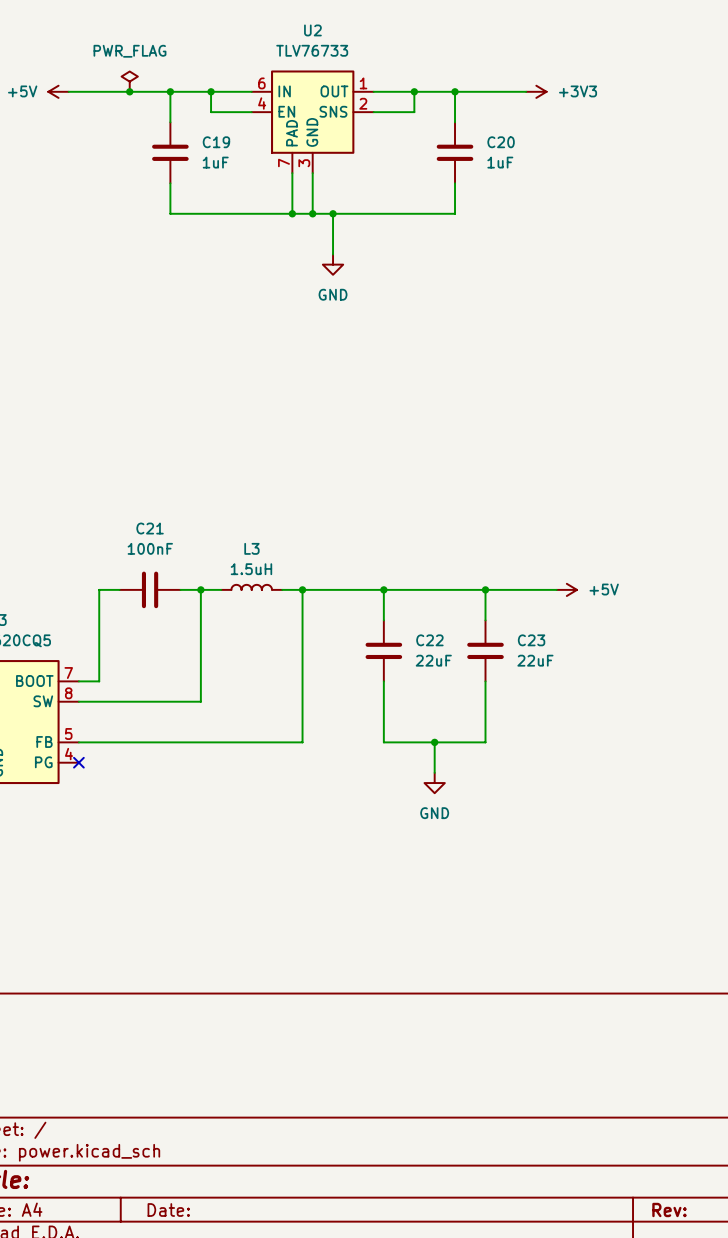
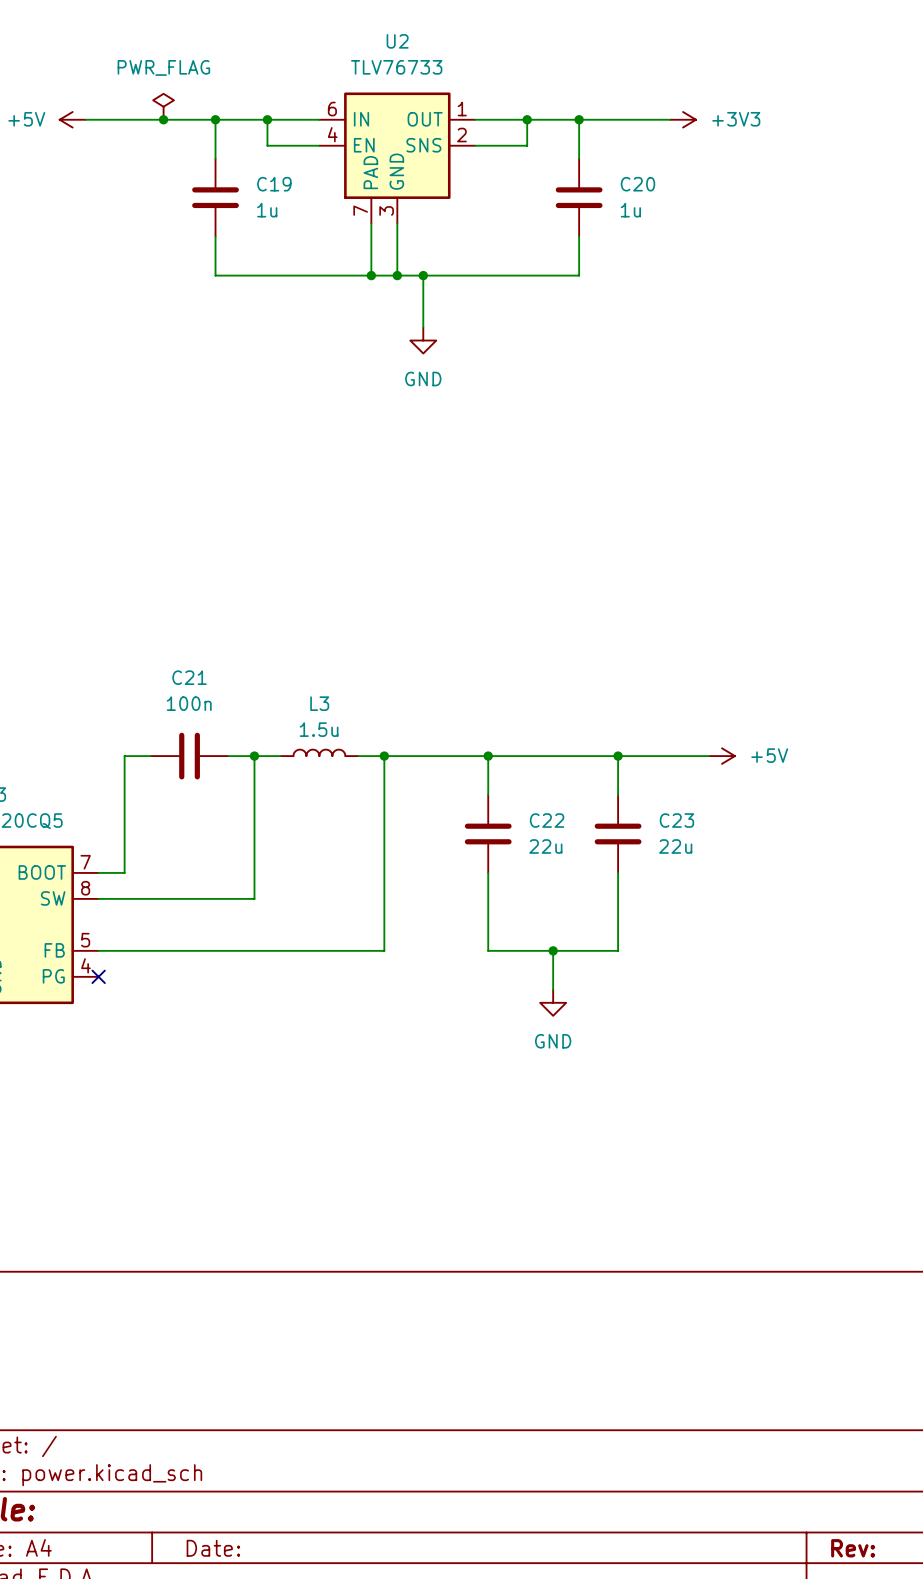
C19 value: 1uF (215, 162) -> 1u (267, 210)
C20 value: 1uF (500, 162) -> 1u (630, 210)
C21 value: 100nF (150, 548) -> 100n (189, 703)
L3 value: 1.5uH (251, 569) -> 1.5u (319, 729)
C22 value: 22uF (433, 660) -> 22u (545, 846)
C23 value: 22uF (535, 660) -> 22u (675, 846)

